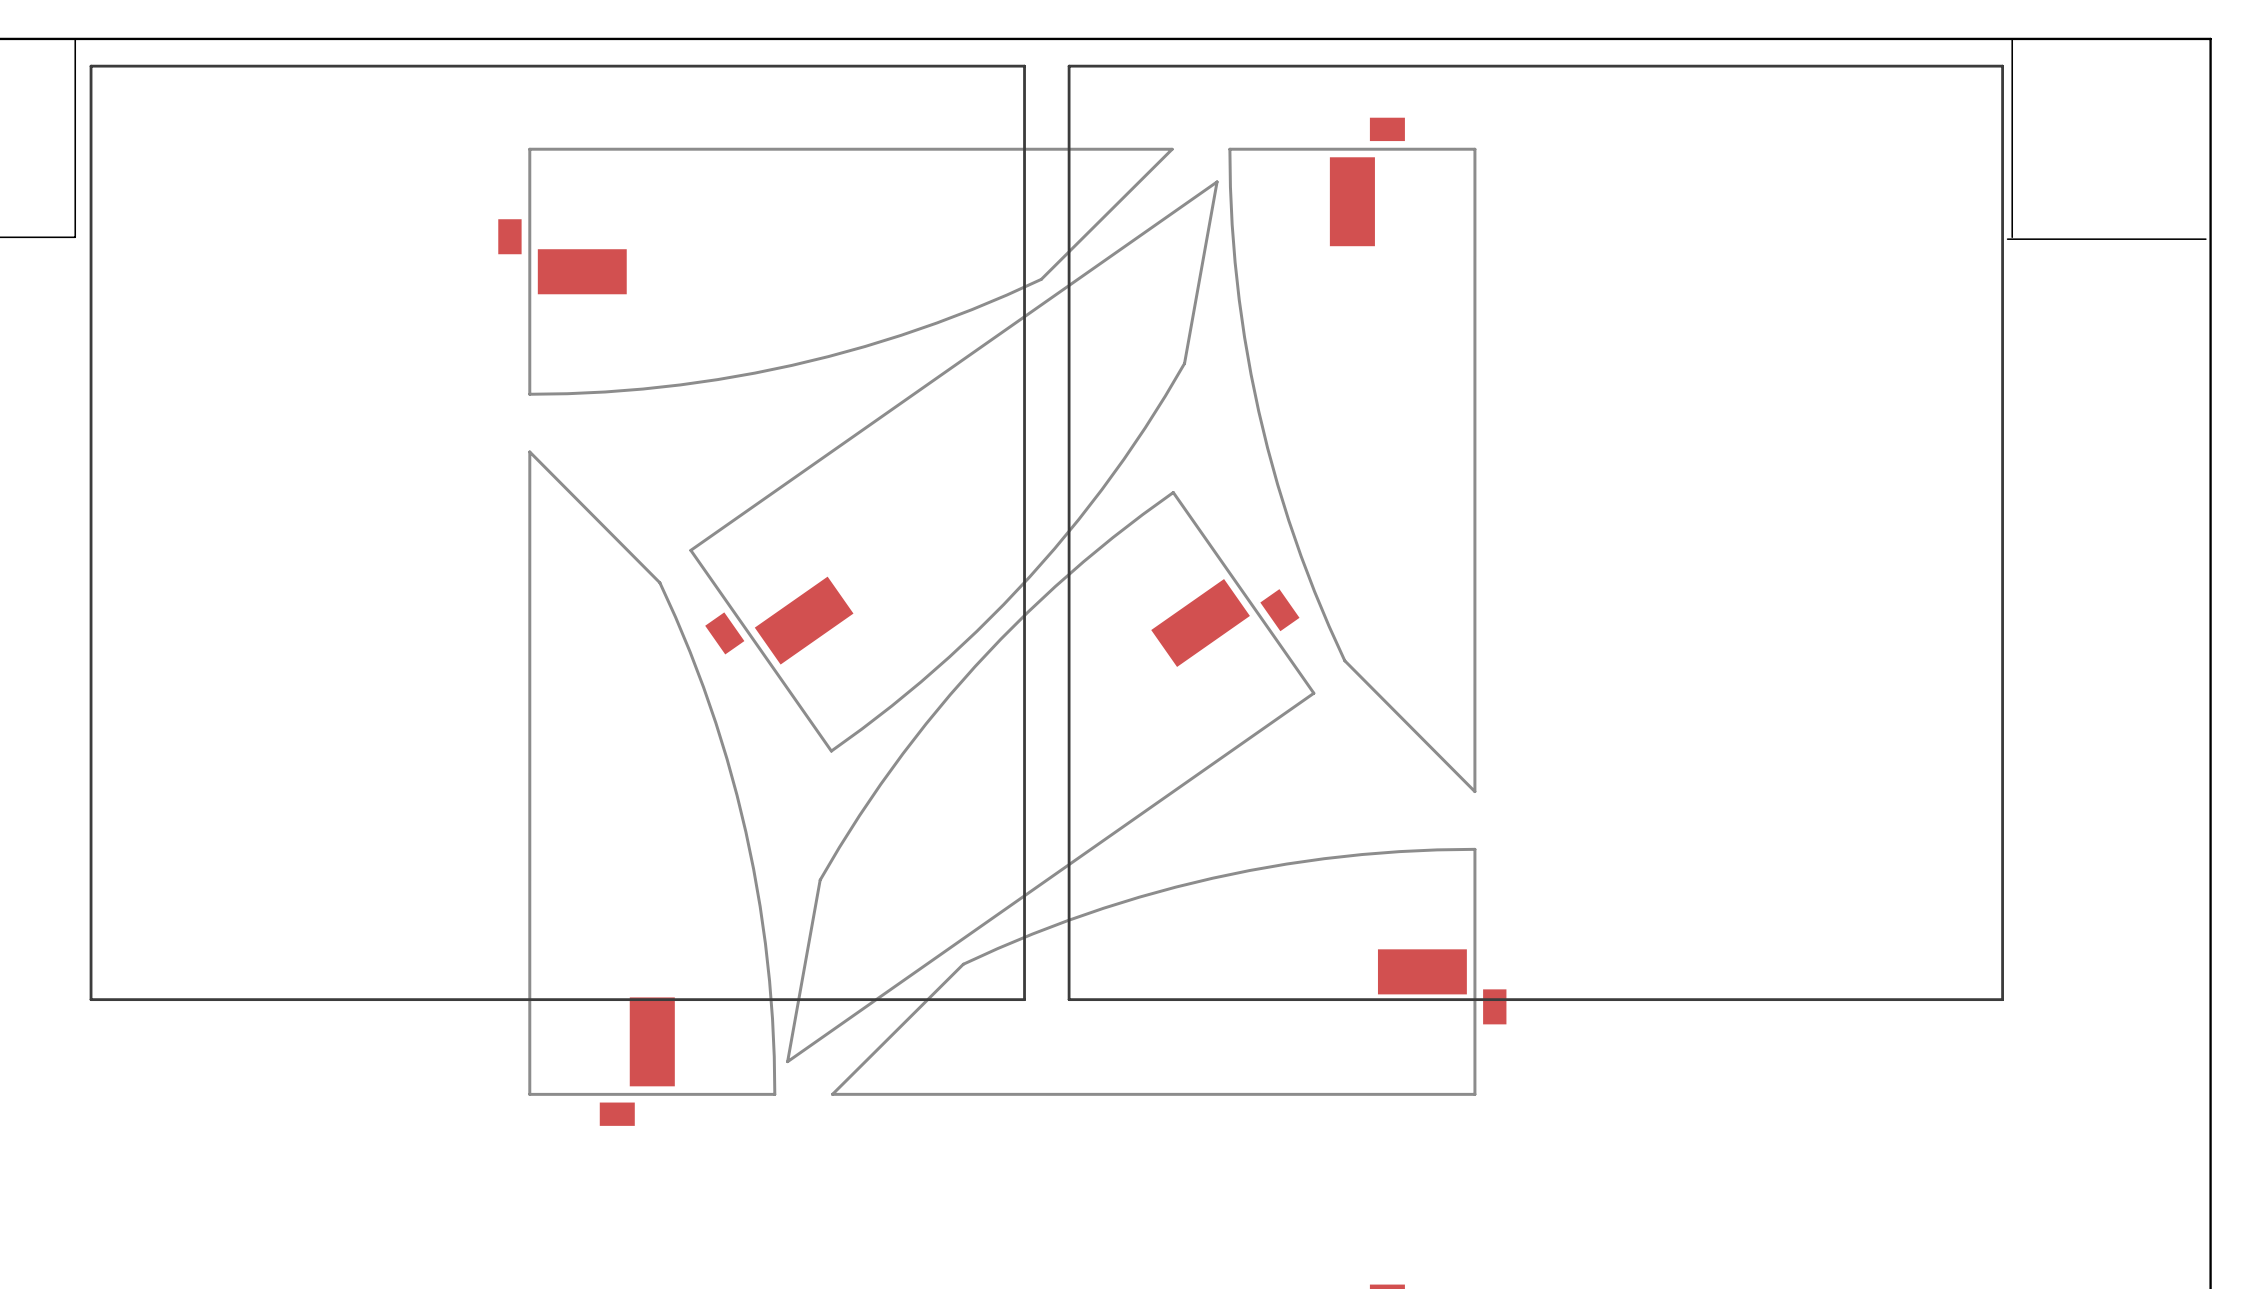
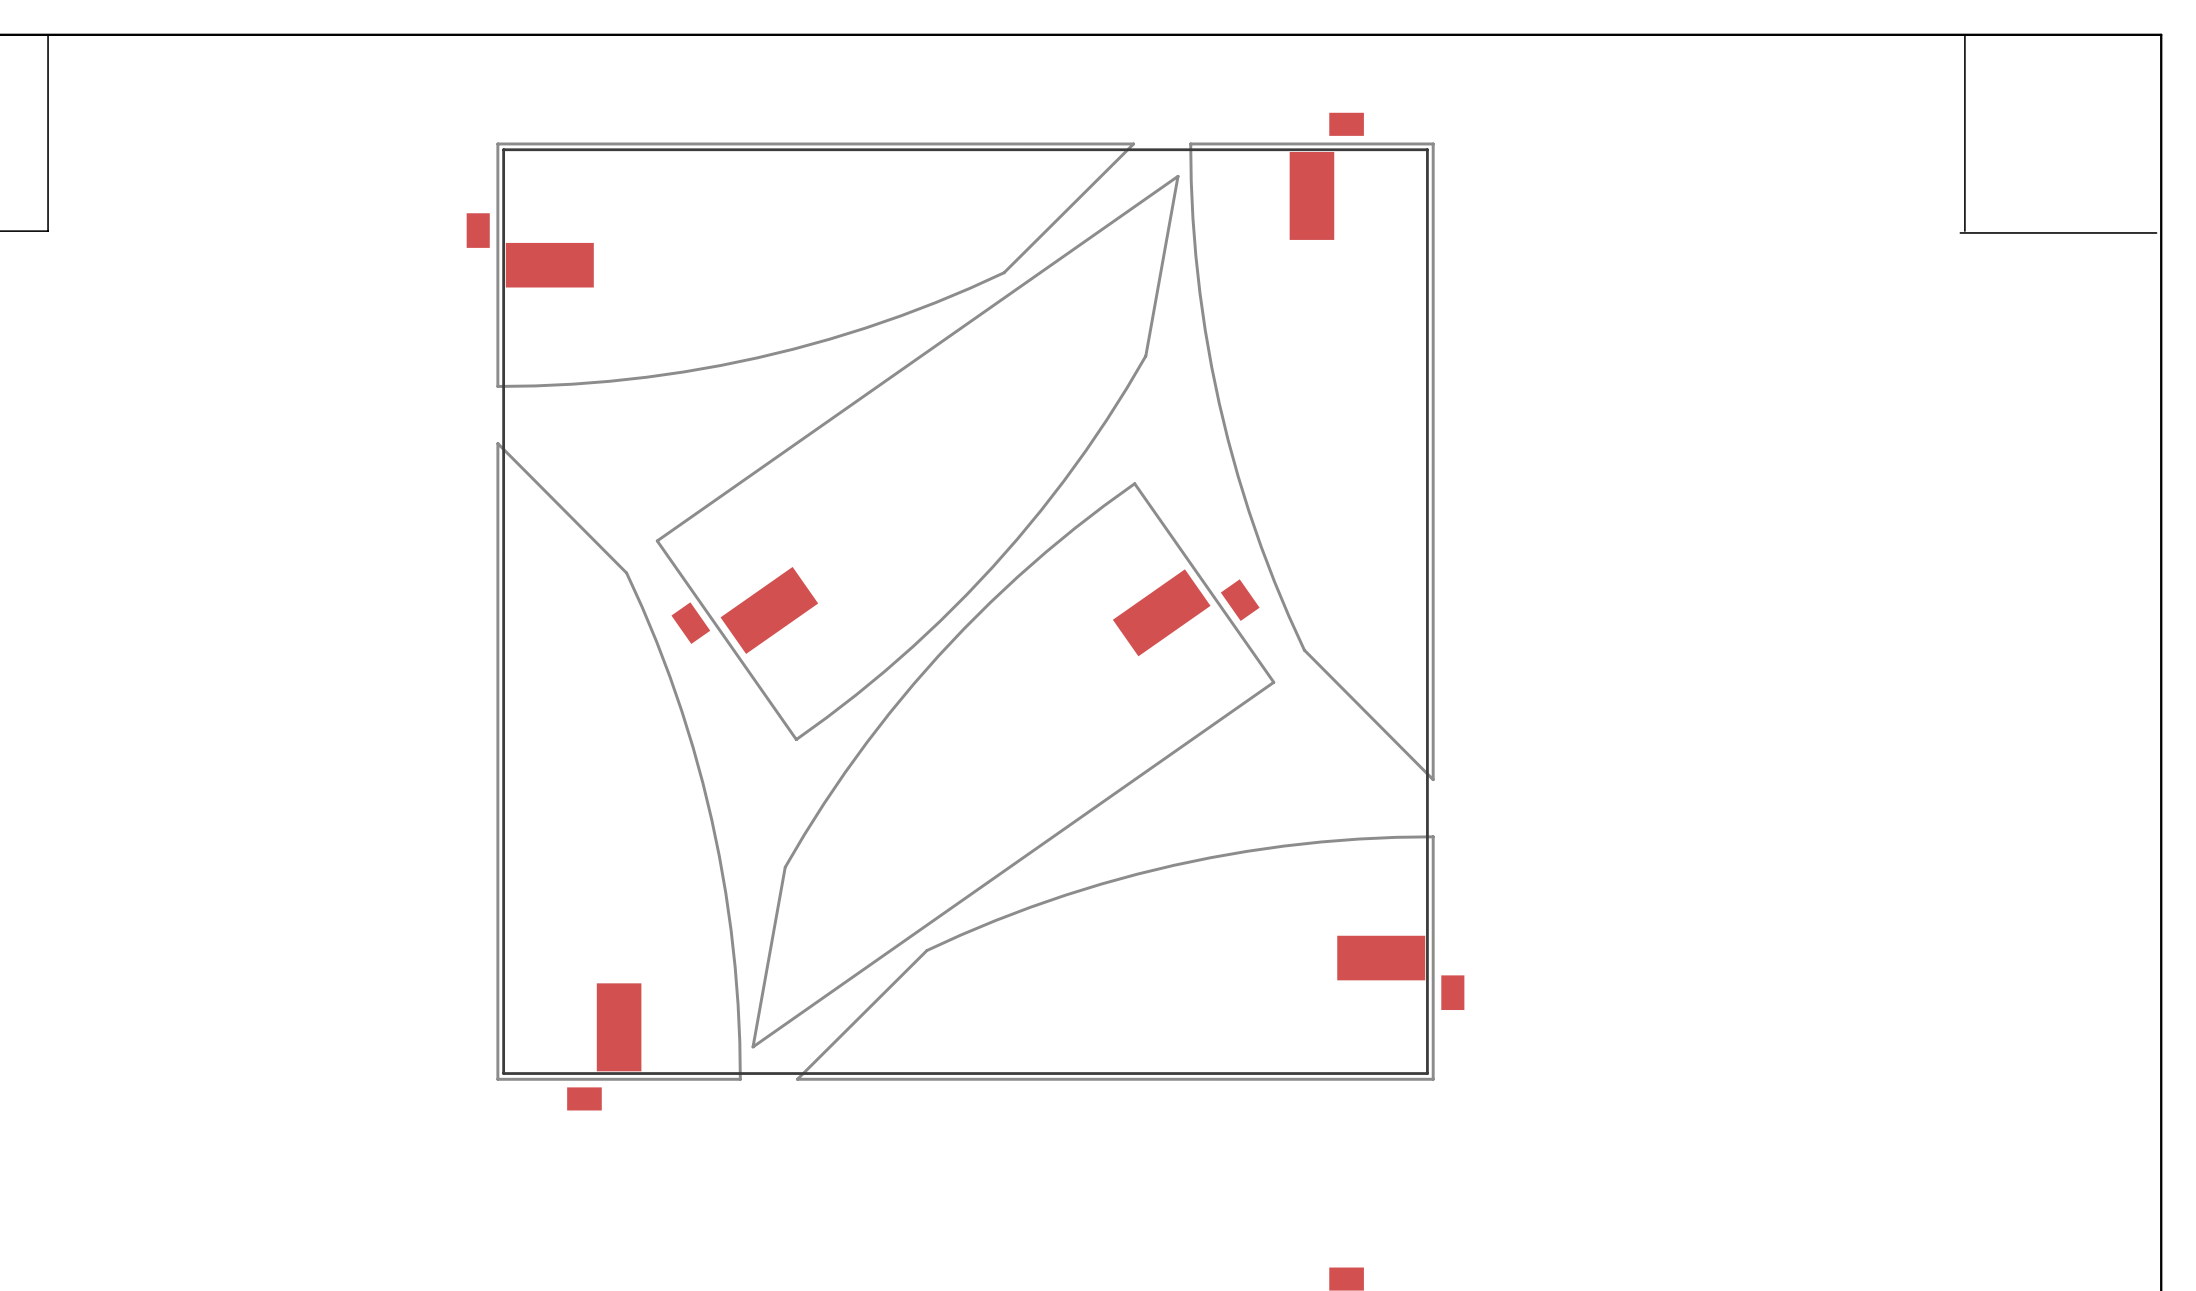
line: (91, 66) (1024, 66) (1024, 999) (91, 999) (91, 66) -> (503, 149) (1427, 149) (1427, 1073) (503, 1073) (503, 149)
line: (1069, 66) (2002, 66) (2002, 999) (1069, 999) (1069, 66) -> none

